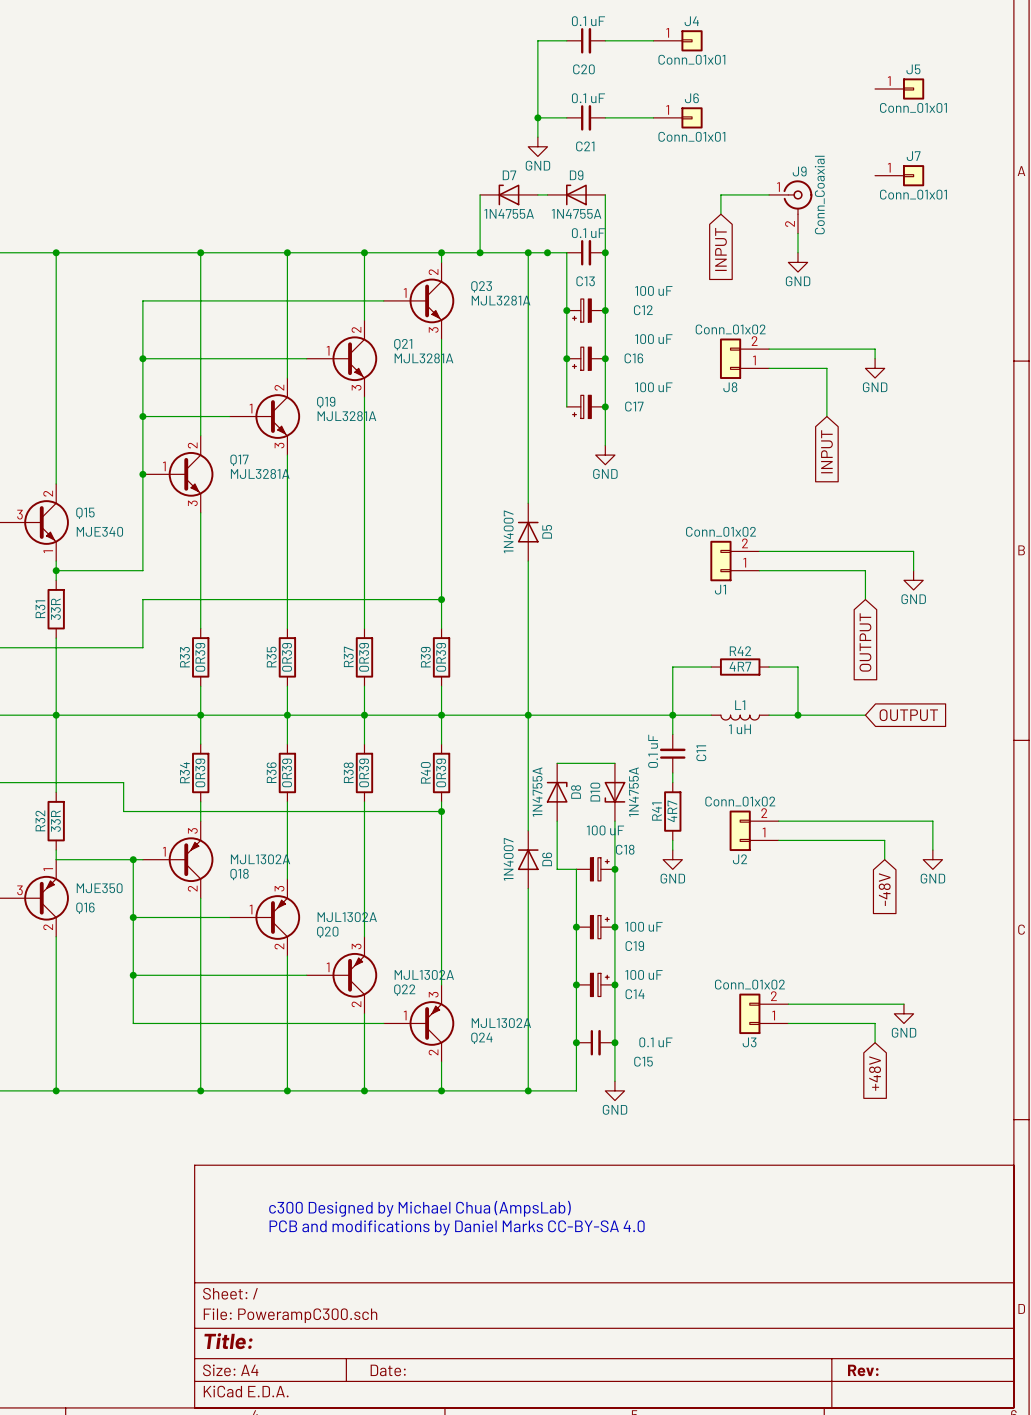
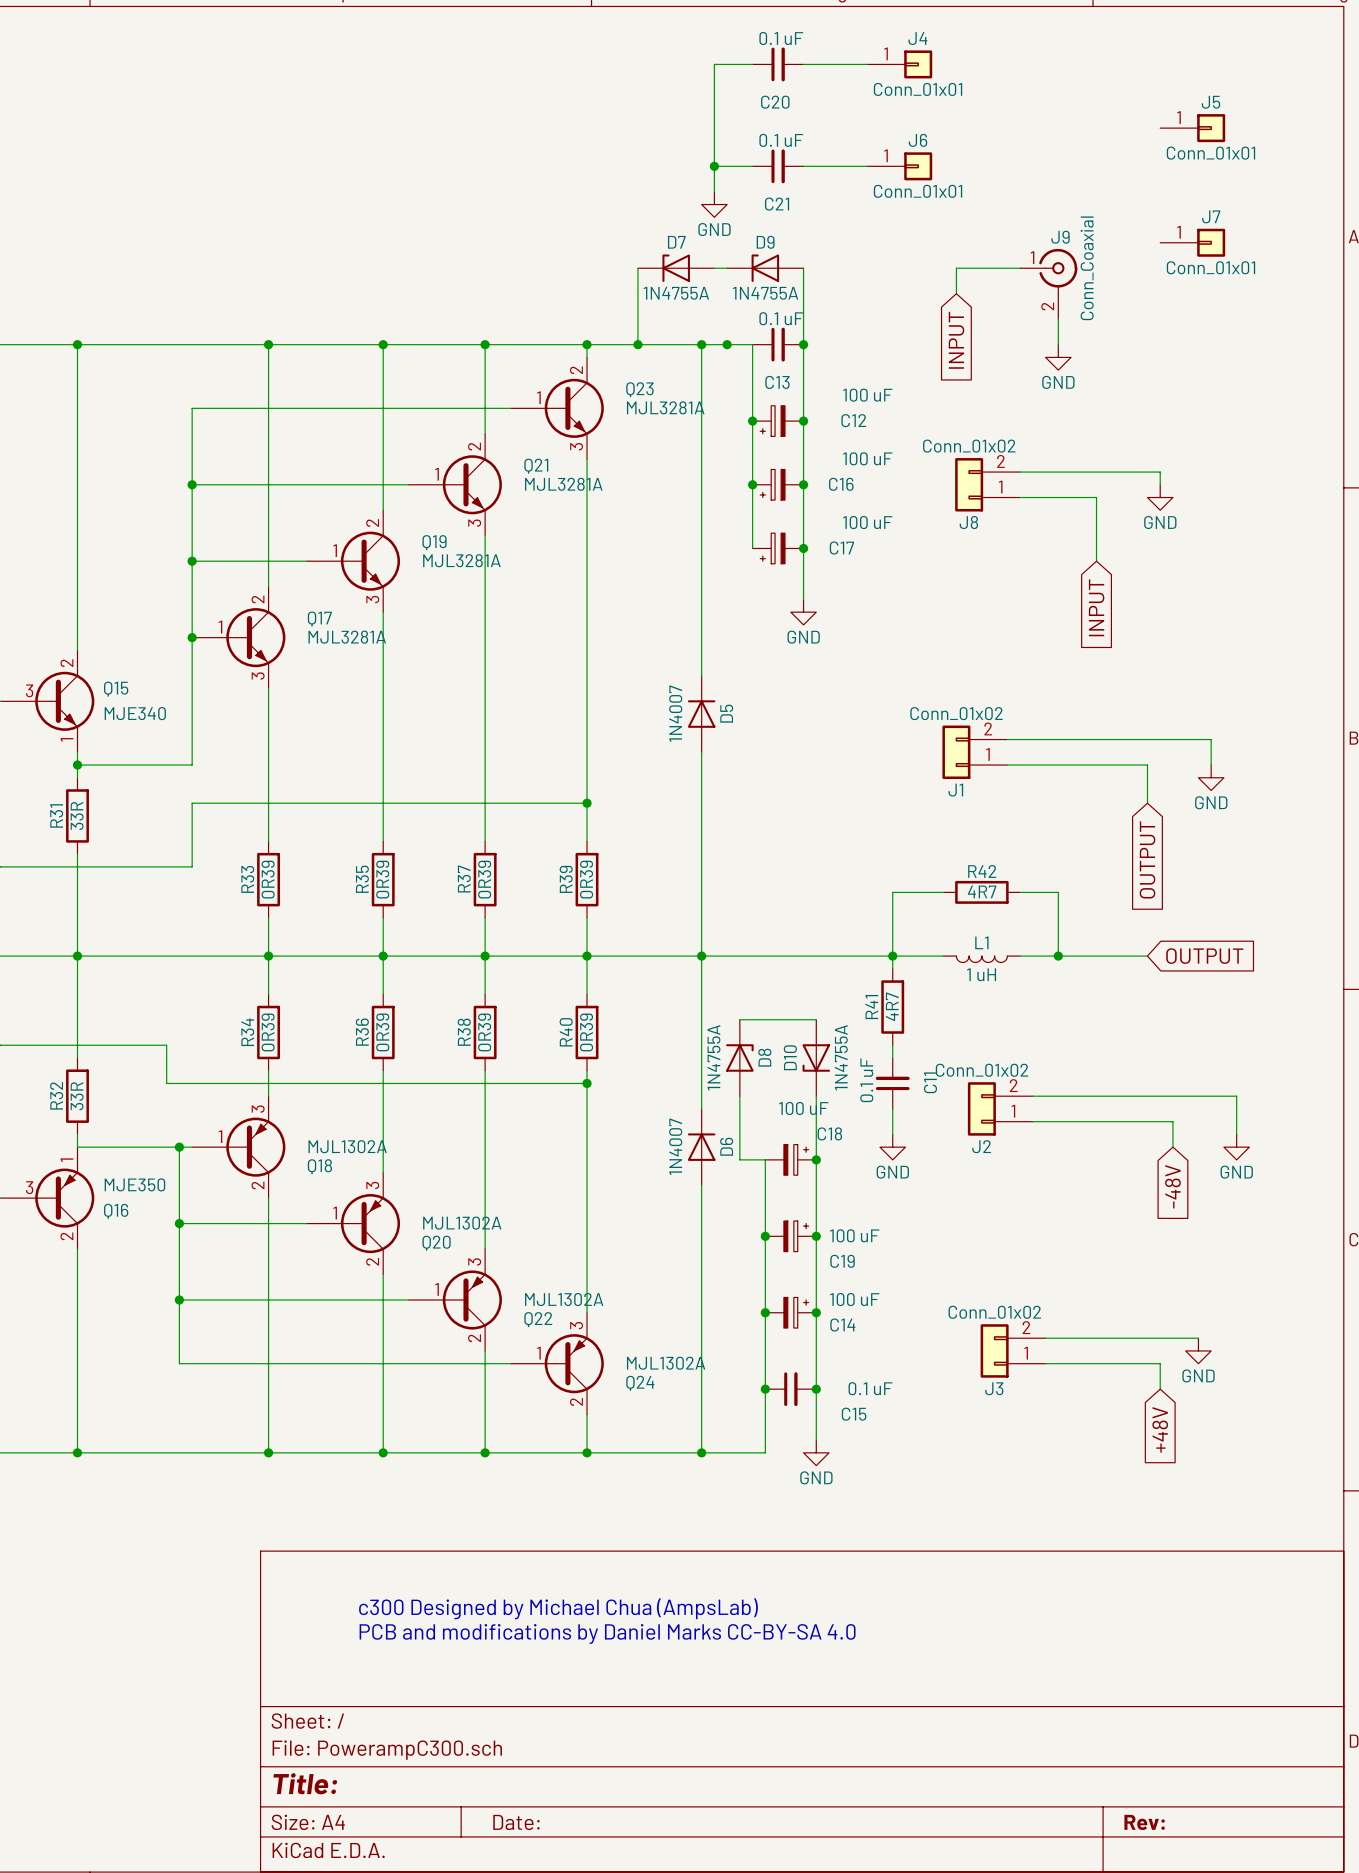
C11 position: (672, 753) -> (892, 1083)
R41 position: (672, 811) -> (892, 1007)

